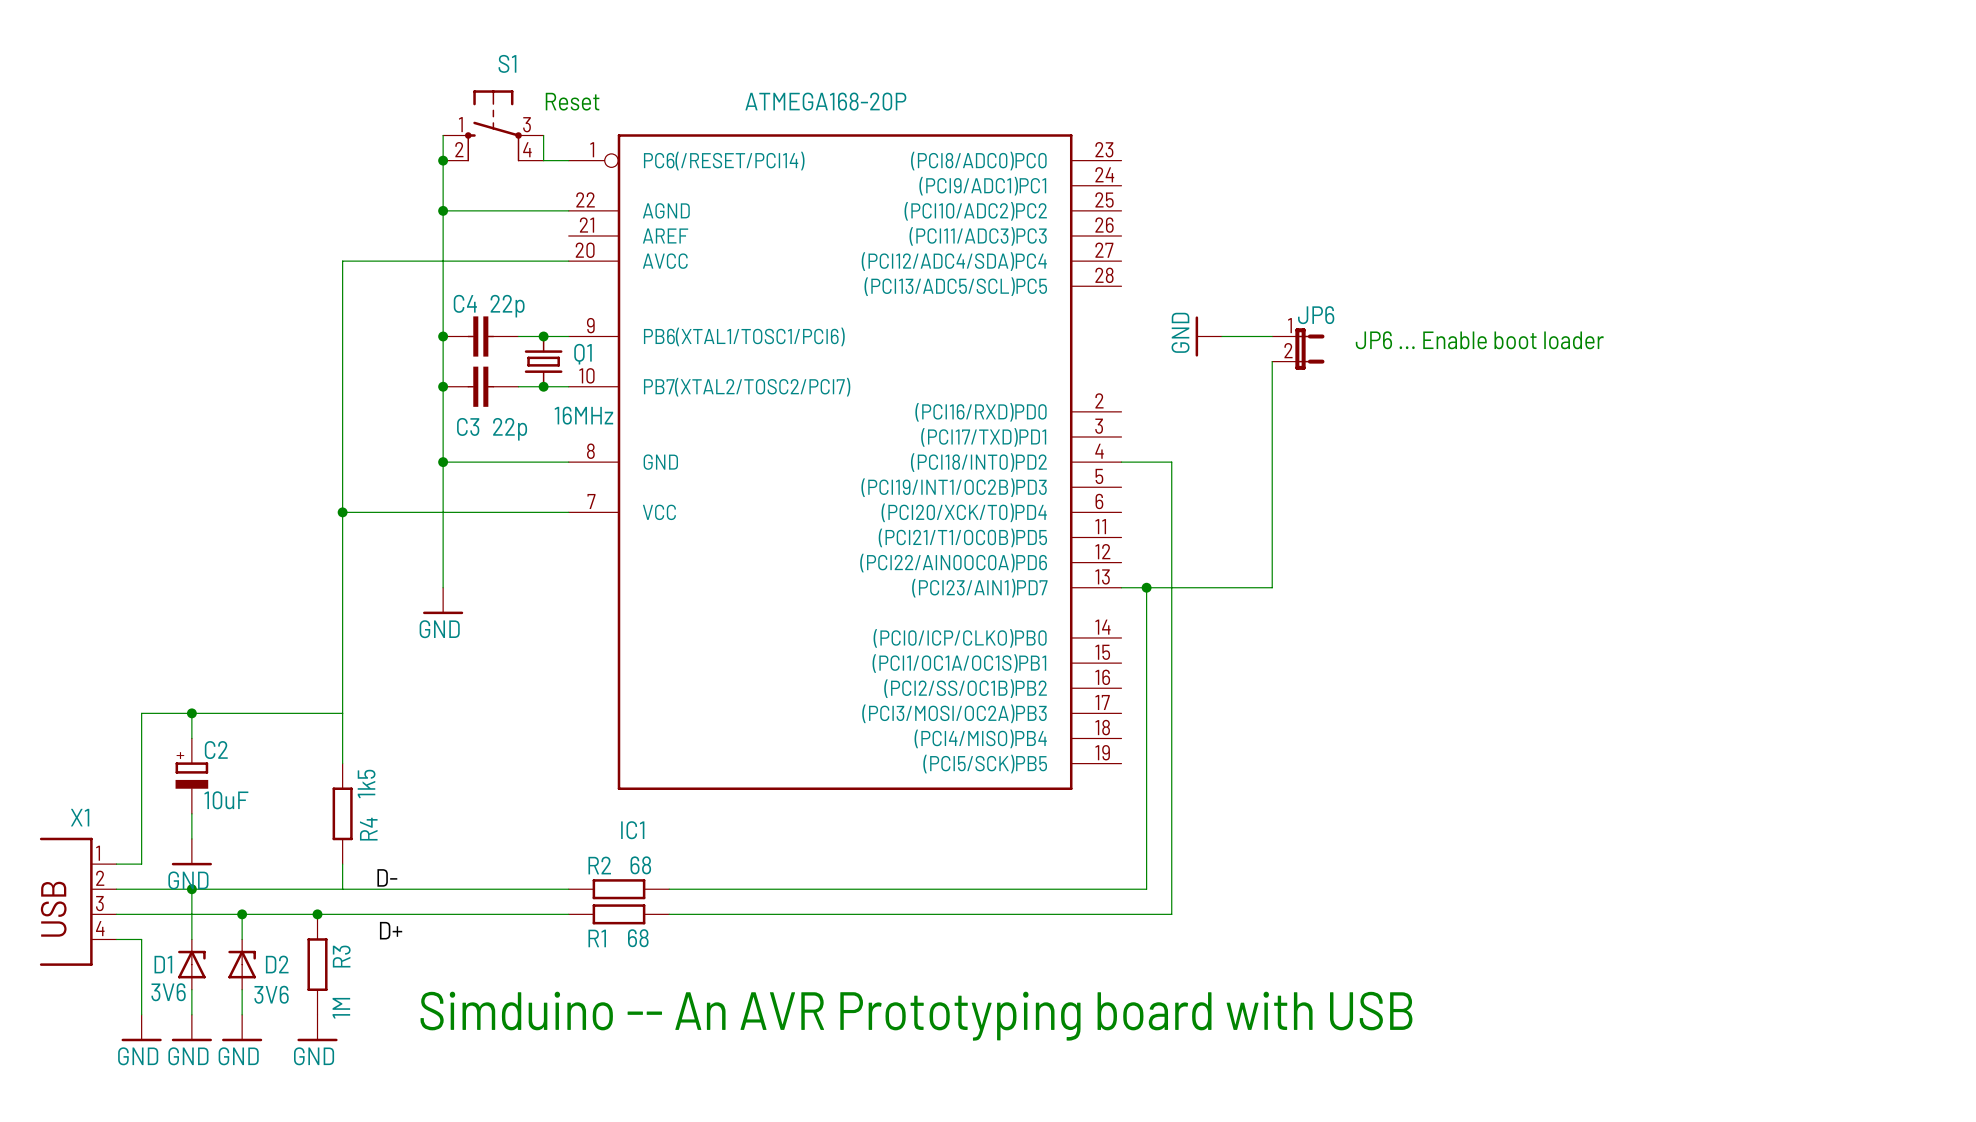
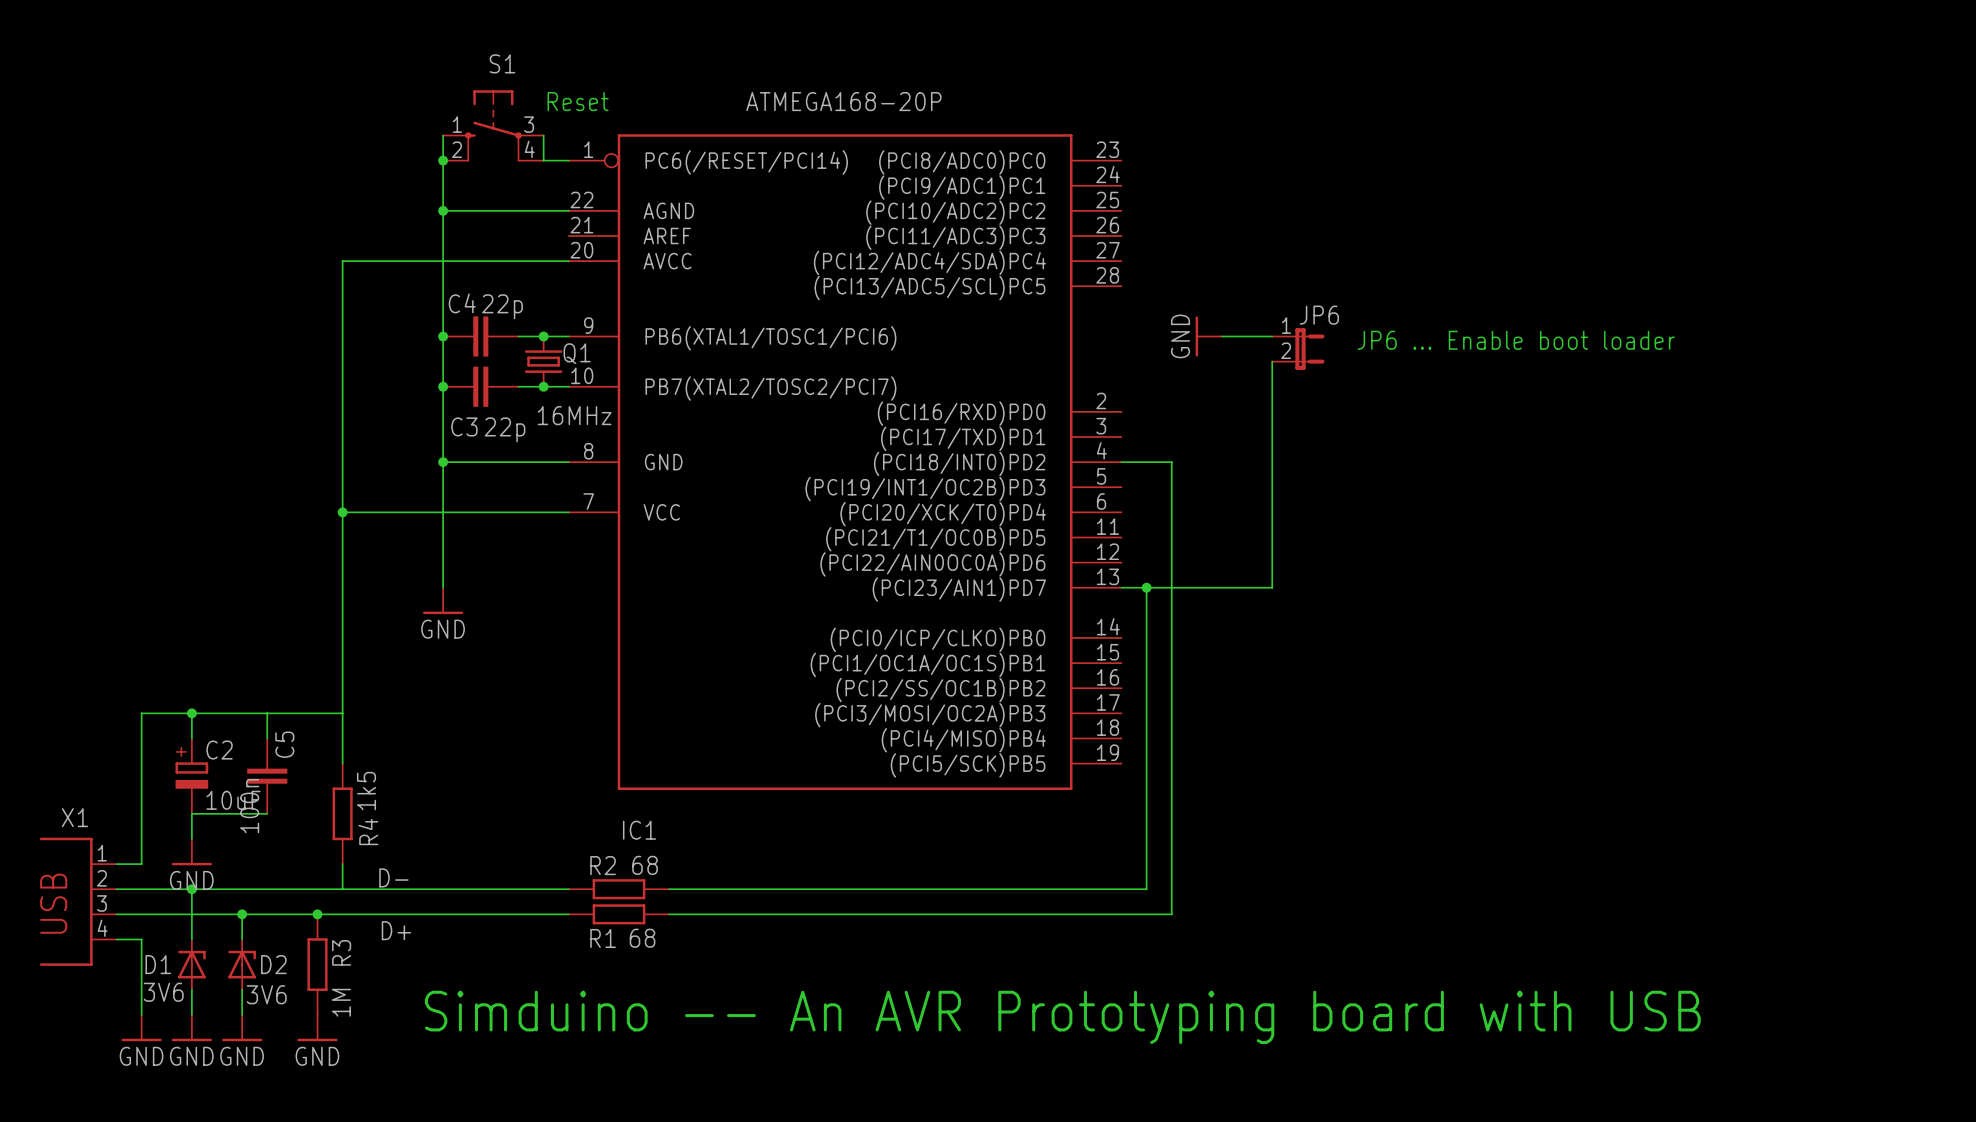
wire: none -> (267, 713) (267, 738)
C5: none -> 100n (267, 776)
wire: none -> (191, 813) (267, 813)

